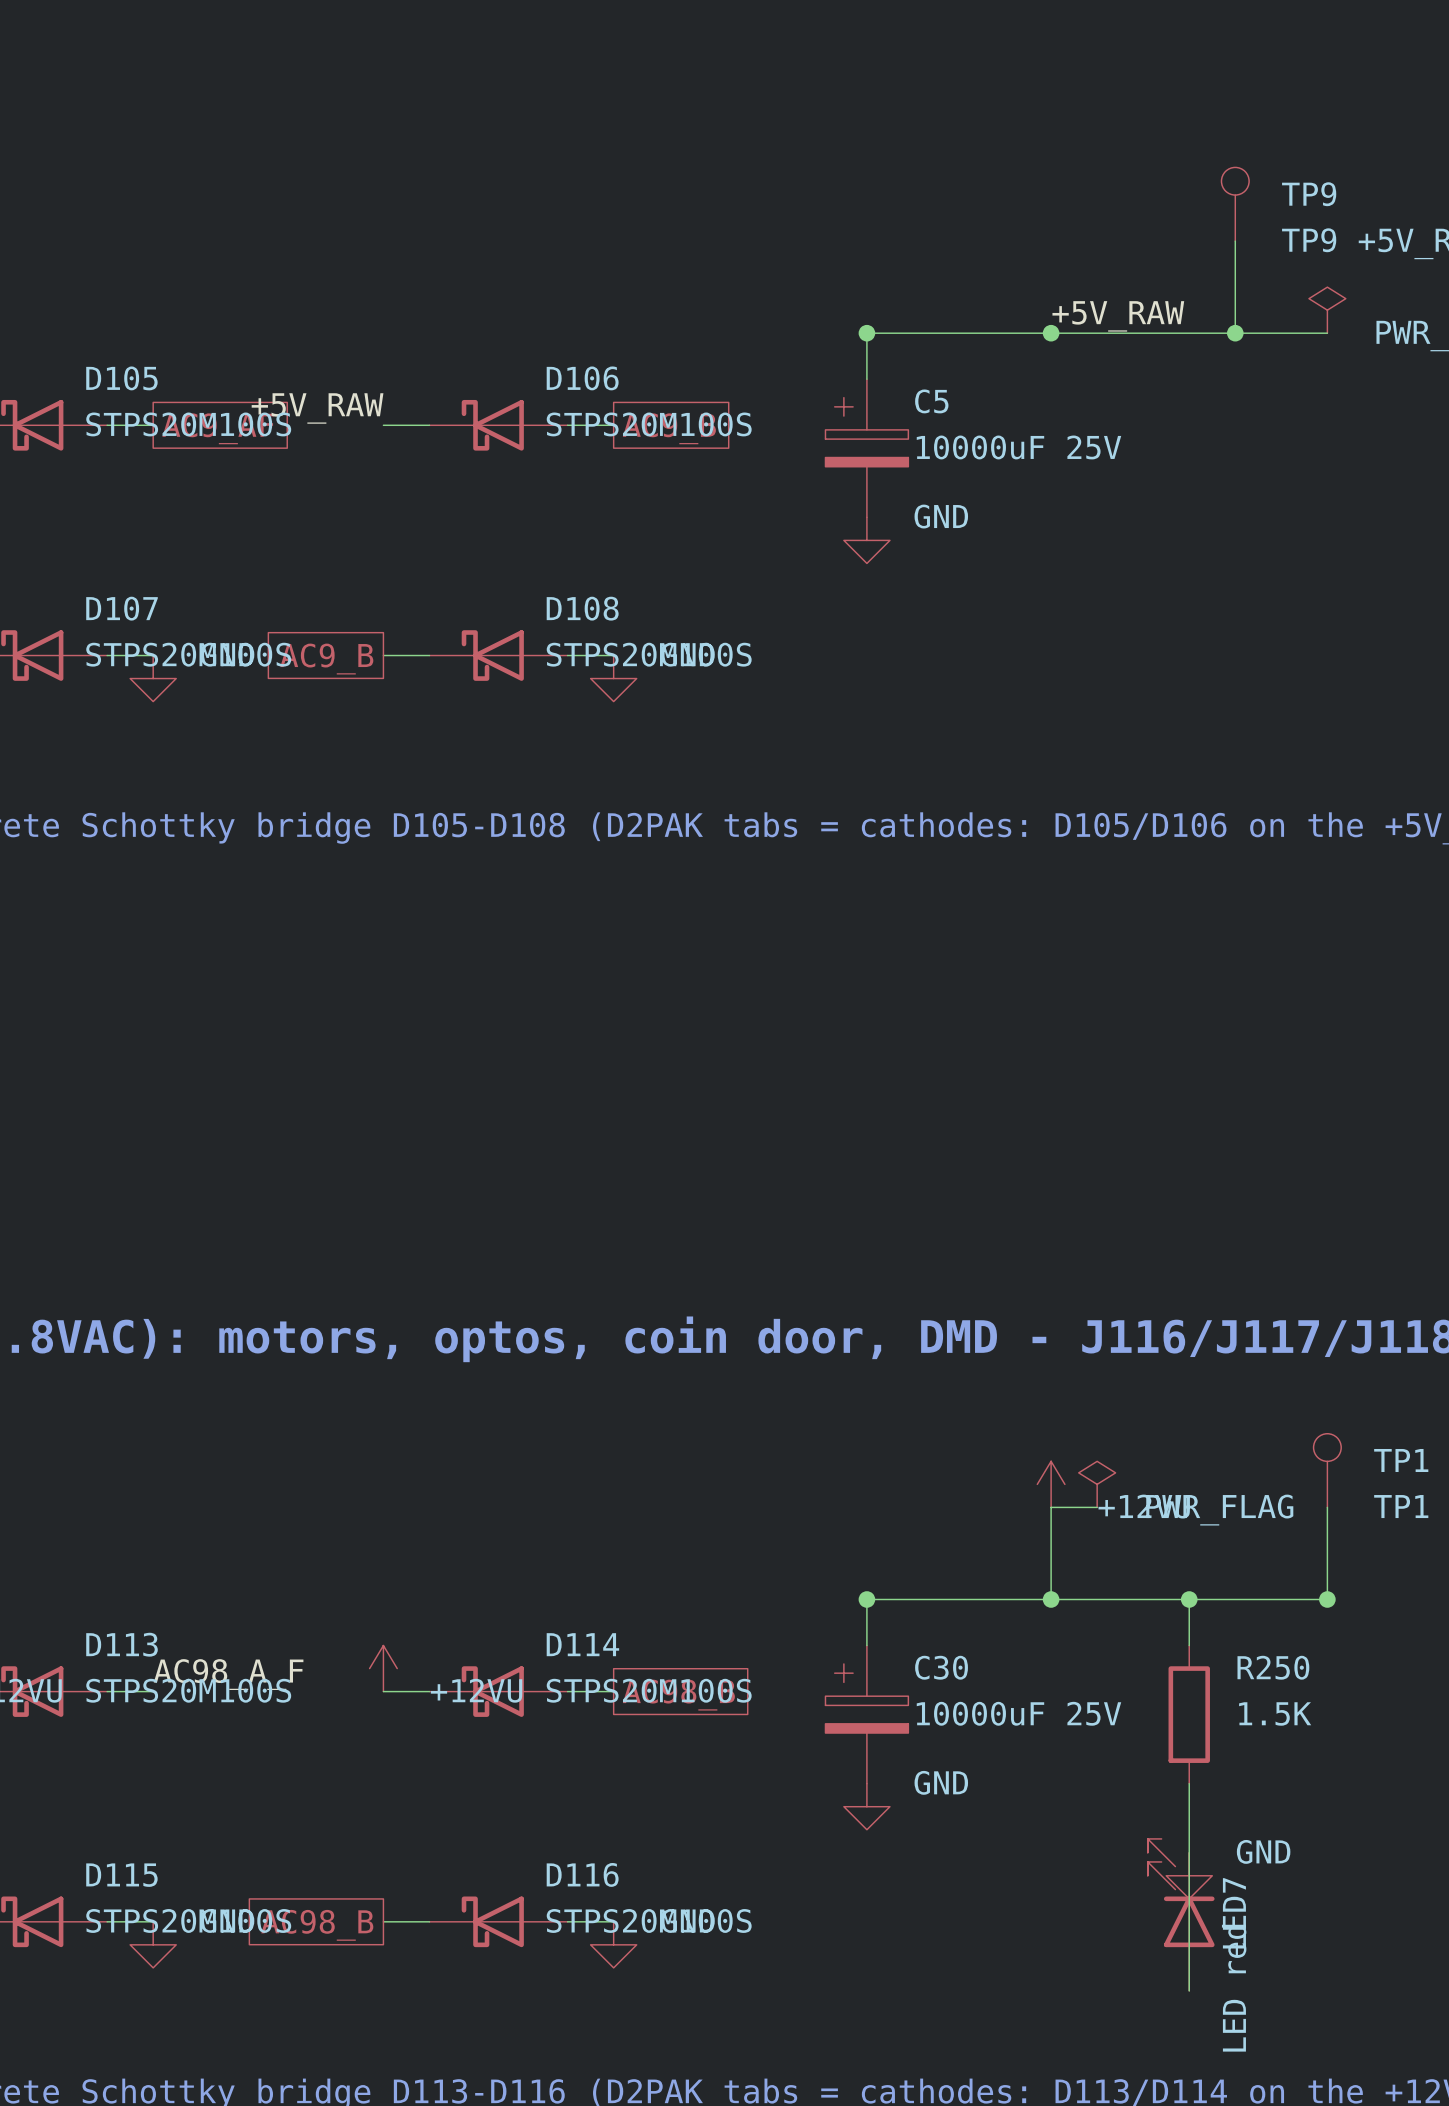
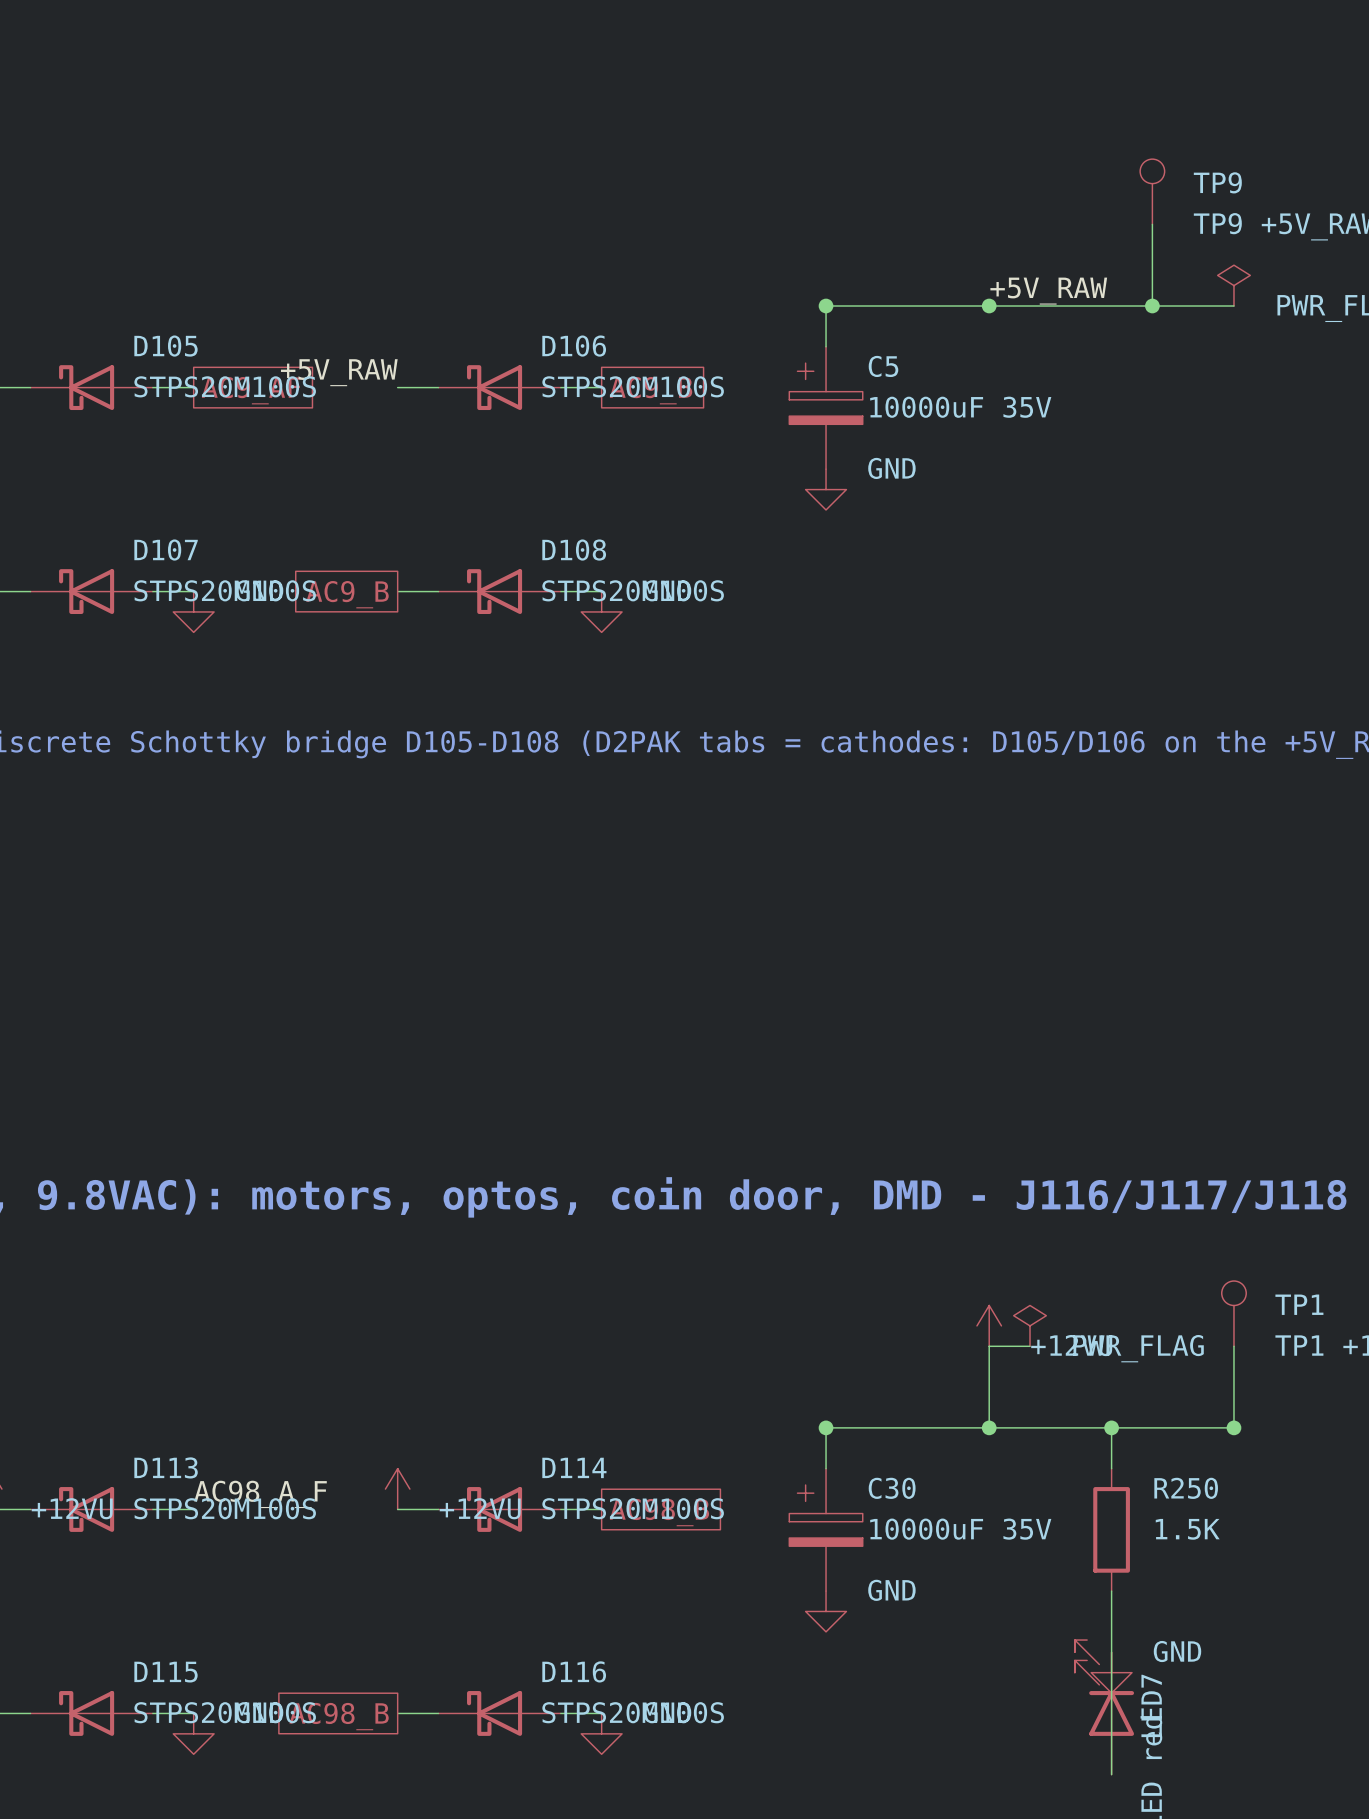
C5 value: 10000uF 25V (1018, 447) -> 10000uF 35V (960, 407)
C30 value: 10000uF 25V (1018, 1713) -> 10000uF 35V (960, 1529)

